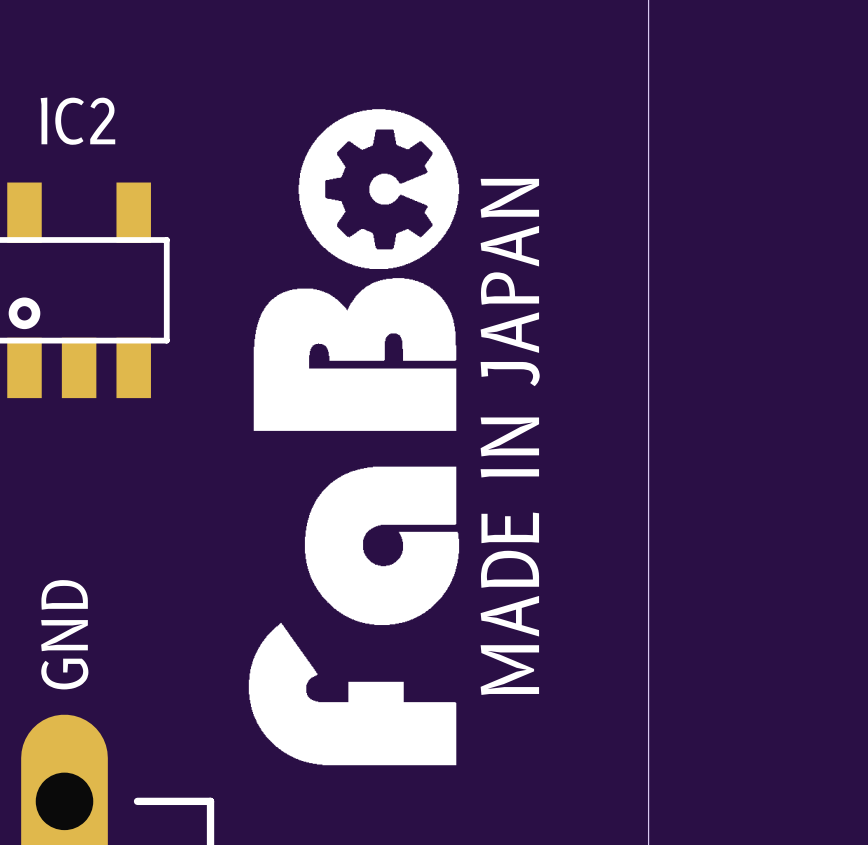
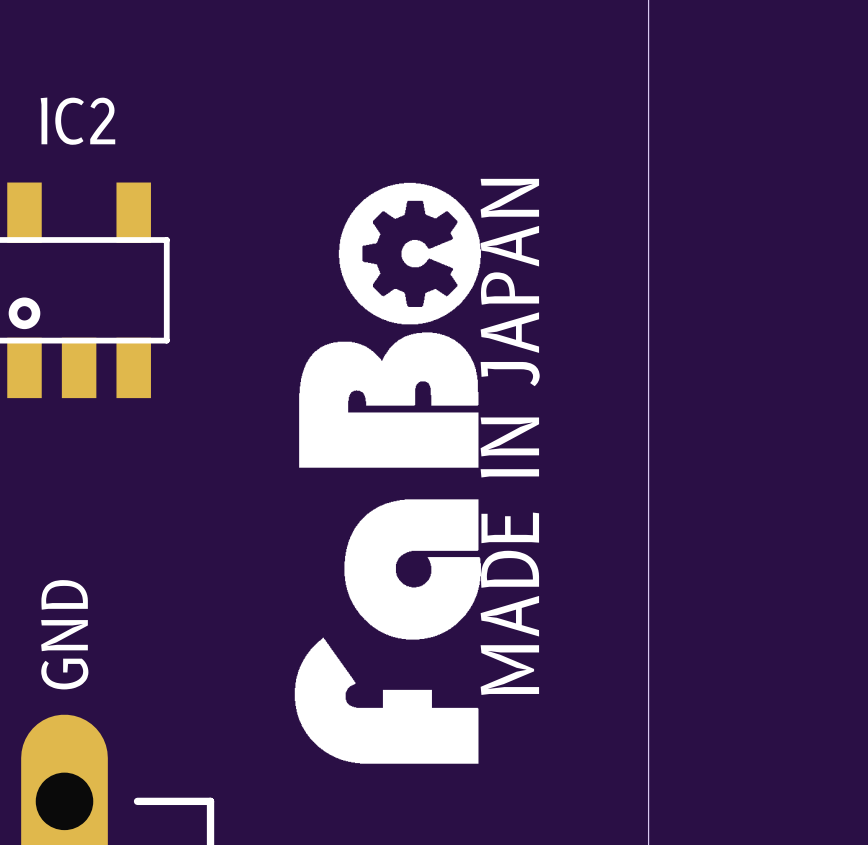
drawing shape: [248, 109, 460, 766] -> [294, 182, 481, 764]

